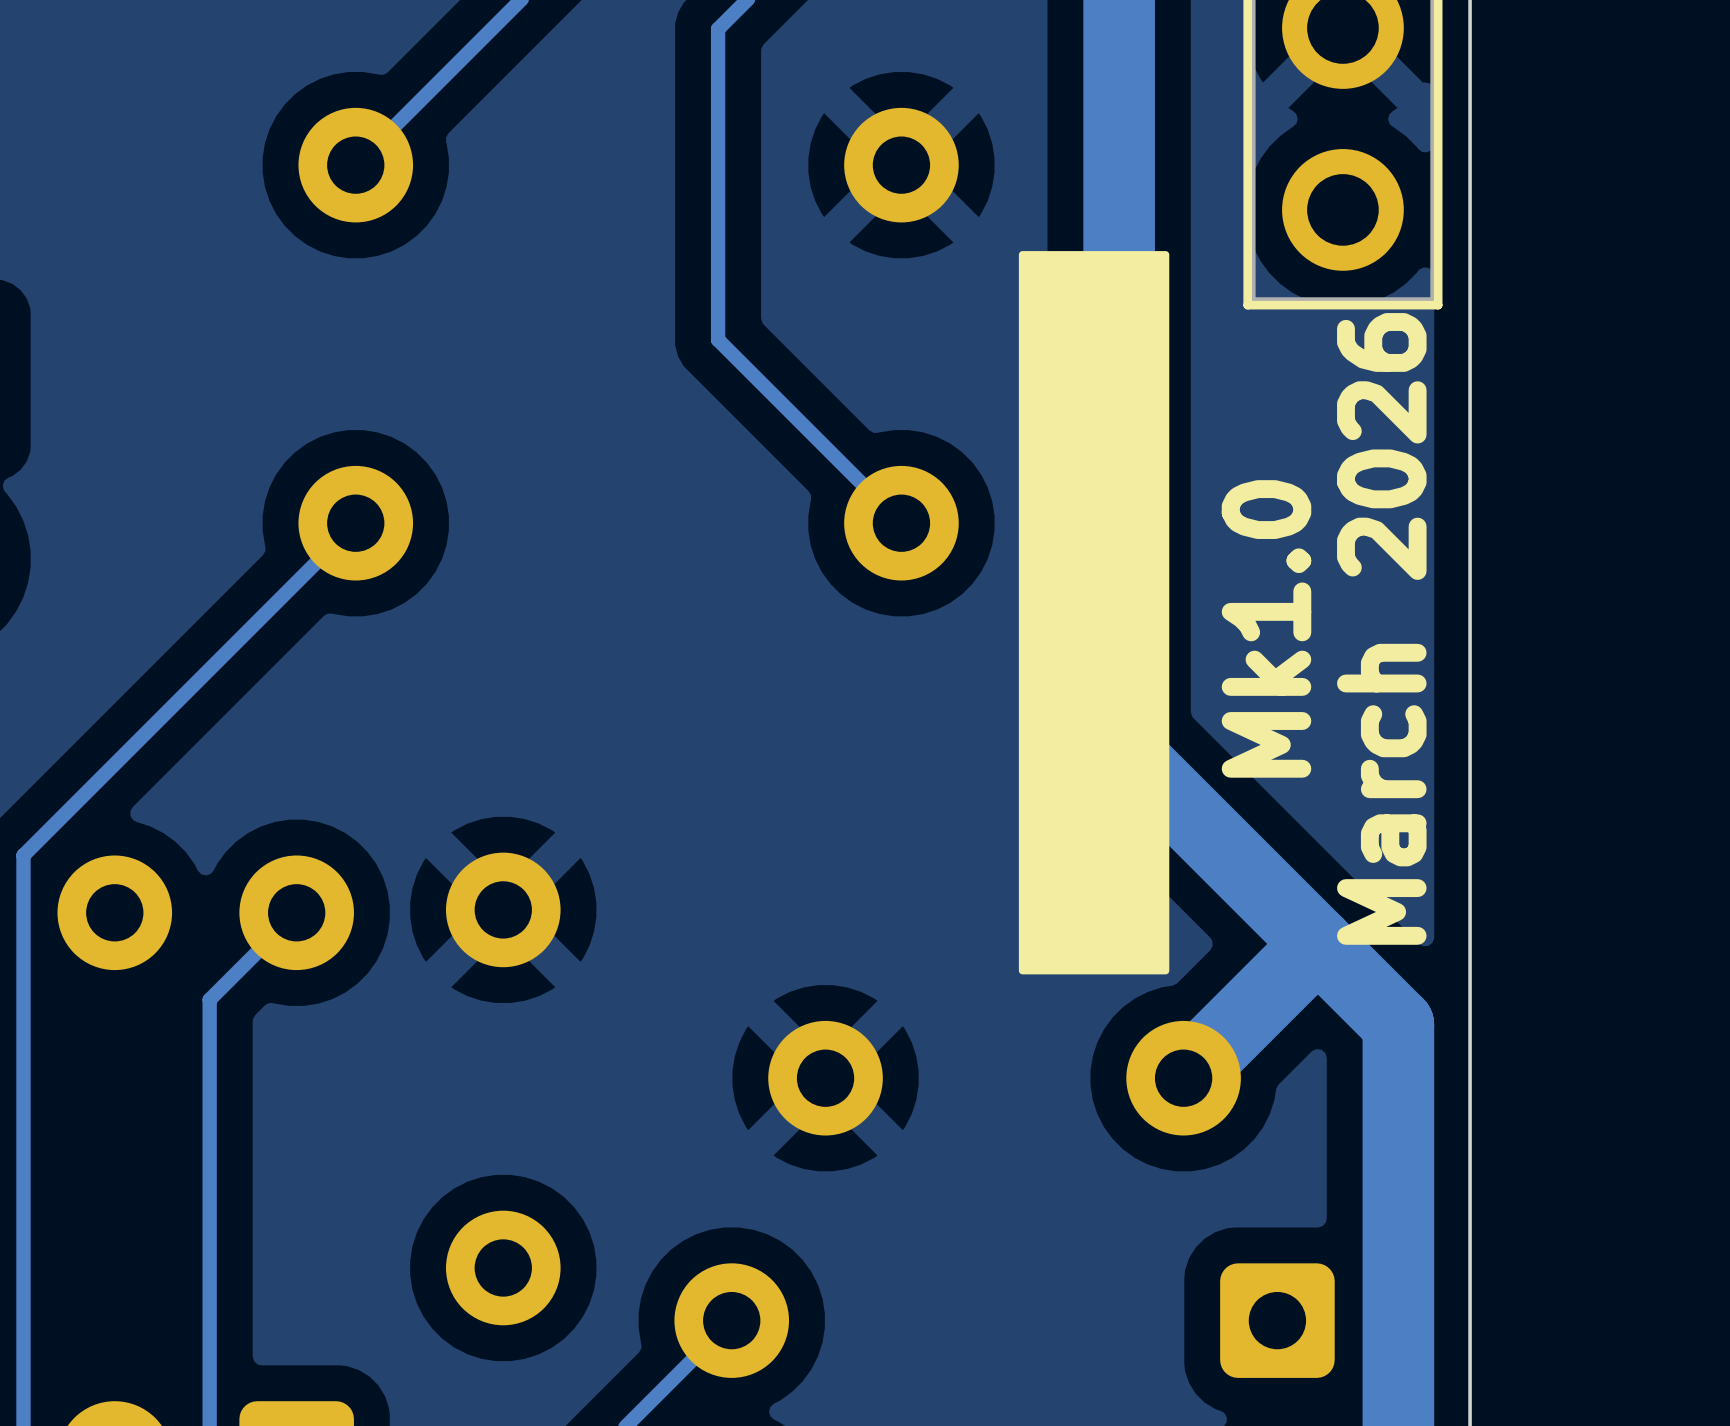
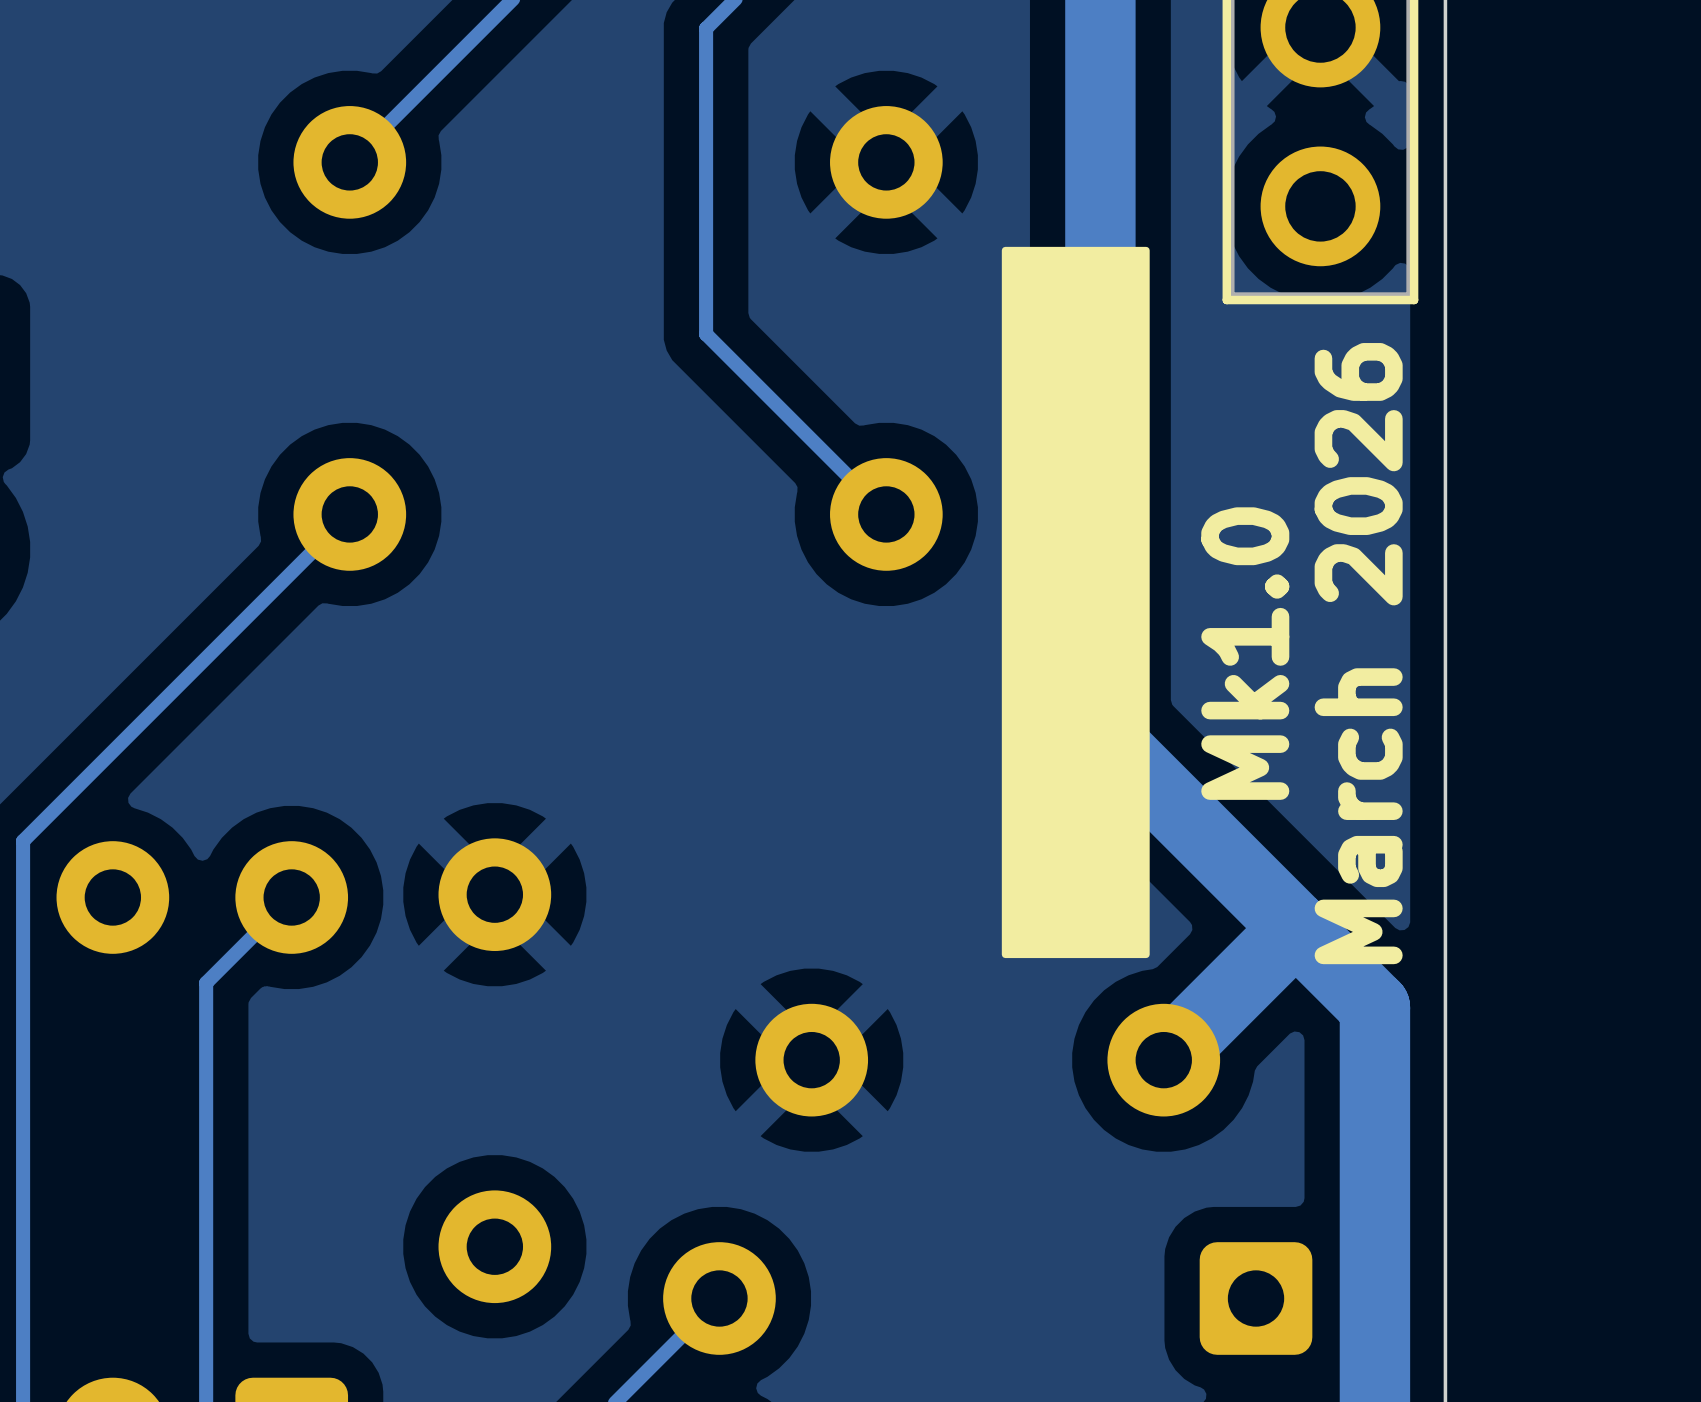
text position: Mk1.0 (1266, 628) -> Mk1.0 (1245, 653)
text position: March 2026 (1381, 628) -> March 2026 (1358, 653)

